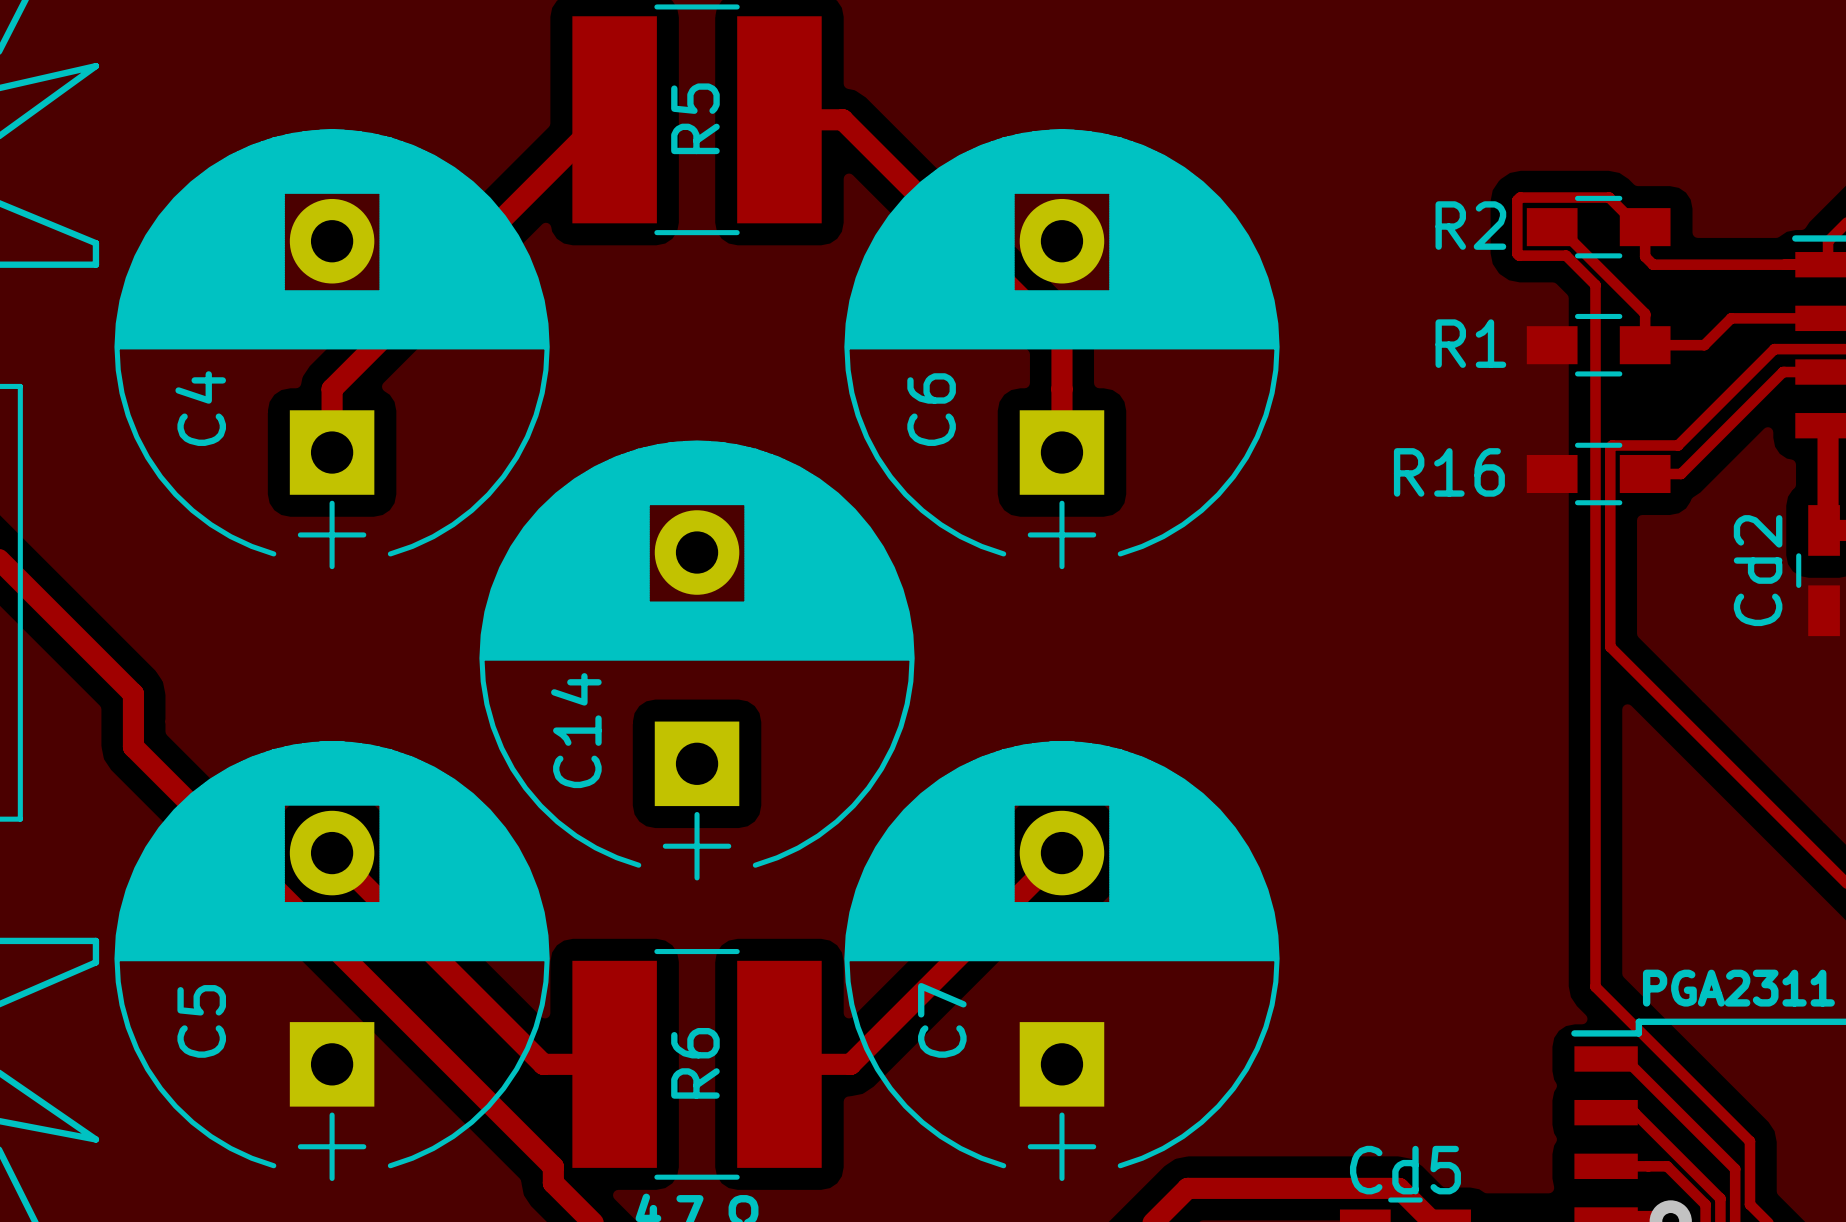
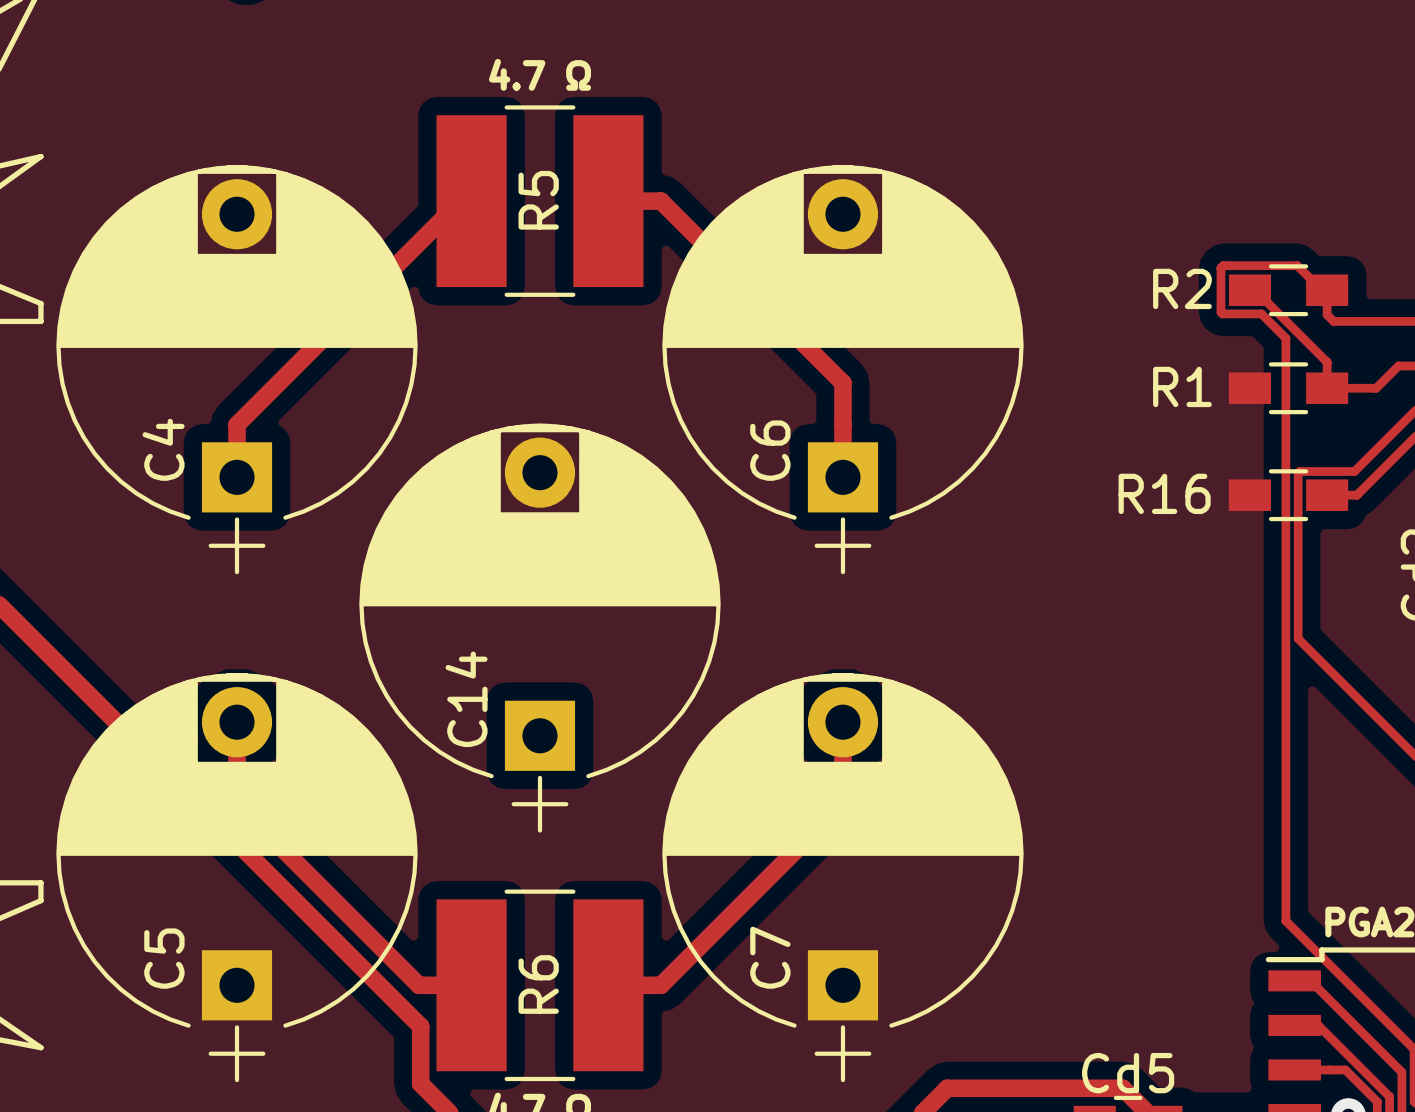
C4 footprint: [114, 129, 550, 570] -> [56, 165, 418, 575]
C6 footprint: [844, 129, 1280, 570] -> [662, 165, 1024, 575]
C14 footprint: [479, 440, 915, 881] -> [359, 423, 721, 833]
track: (133, 693) (133, 746) (553, 1166) -> (72, 677) (420, 1026) (420, 1070)
C5 footprint: [114, 741, 550, 1181] -> [56, 673, 418, 1083]
C7 footprint: [844, 741, 1280, 1181] -> [662, 673, 1024, 1083]
track: (332, 853) (543, 1064) (551, 1064) -> (237, 722) (237, 803) (418, 985)
track: (1061, 853) (850, 1064) (842, 1064) -> (842, 722) (842, 803) (661, 985)

